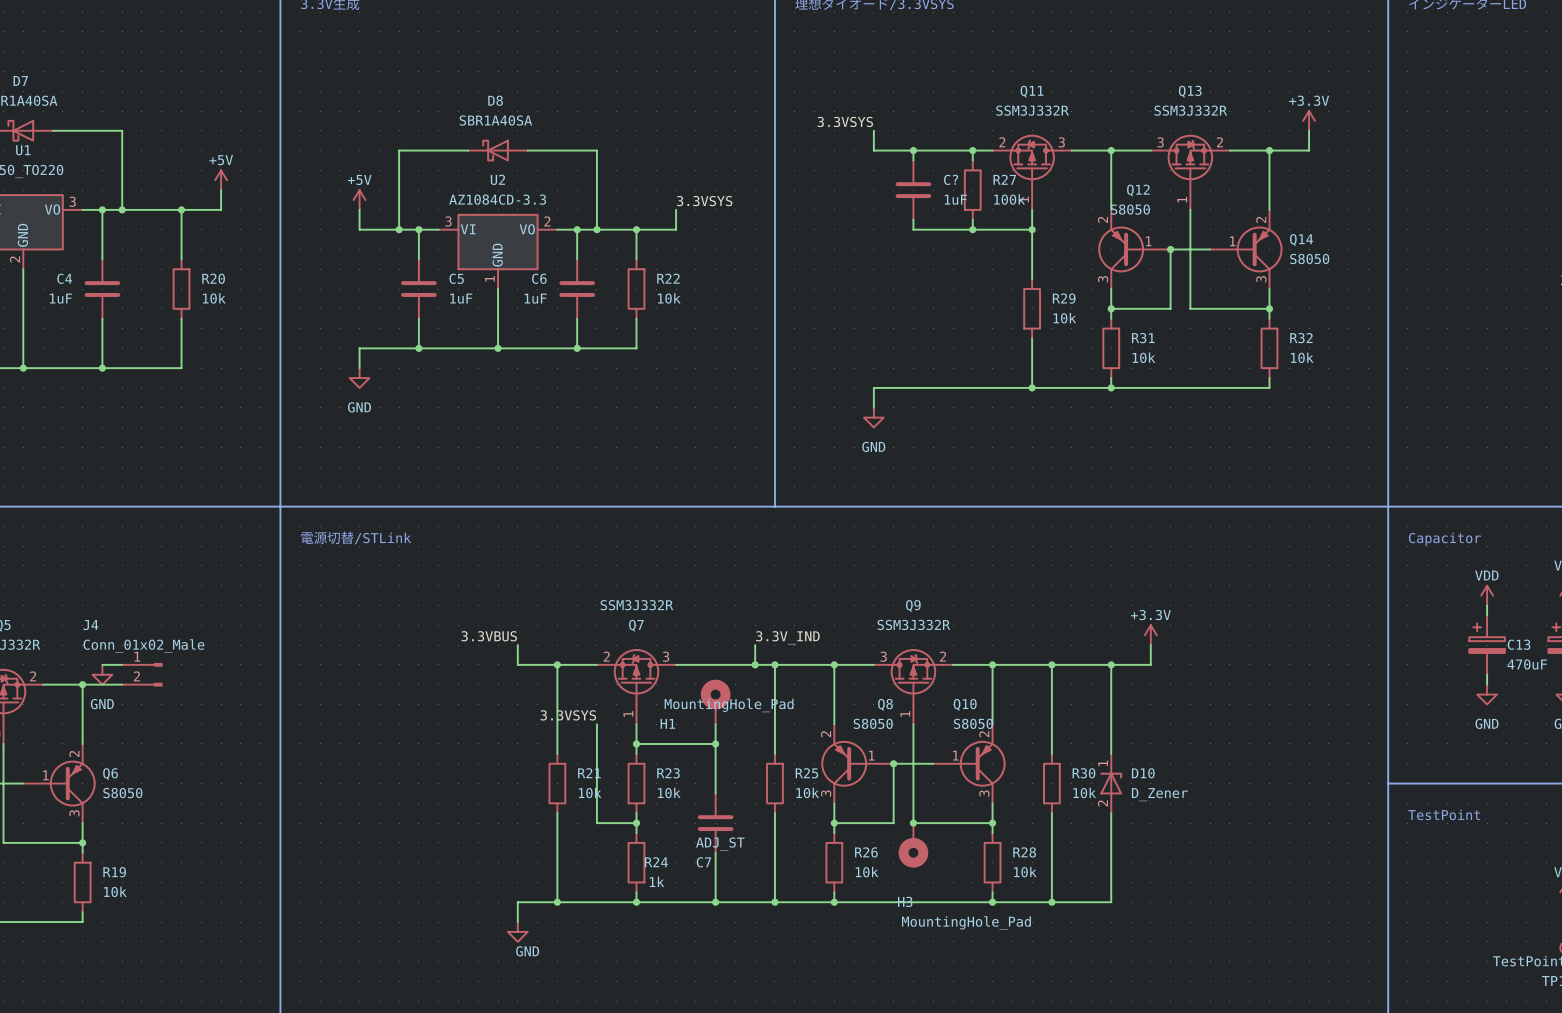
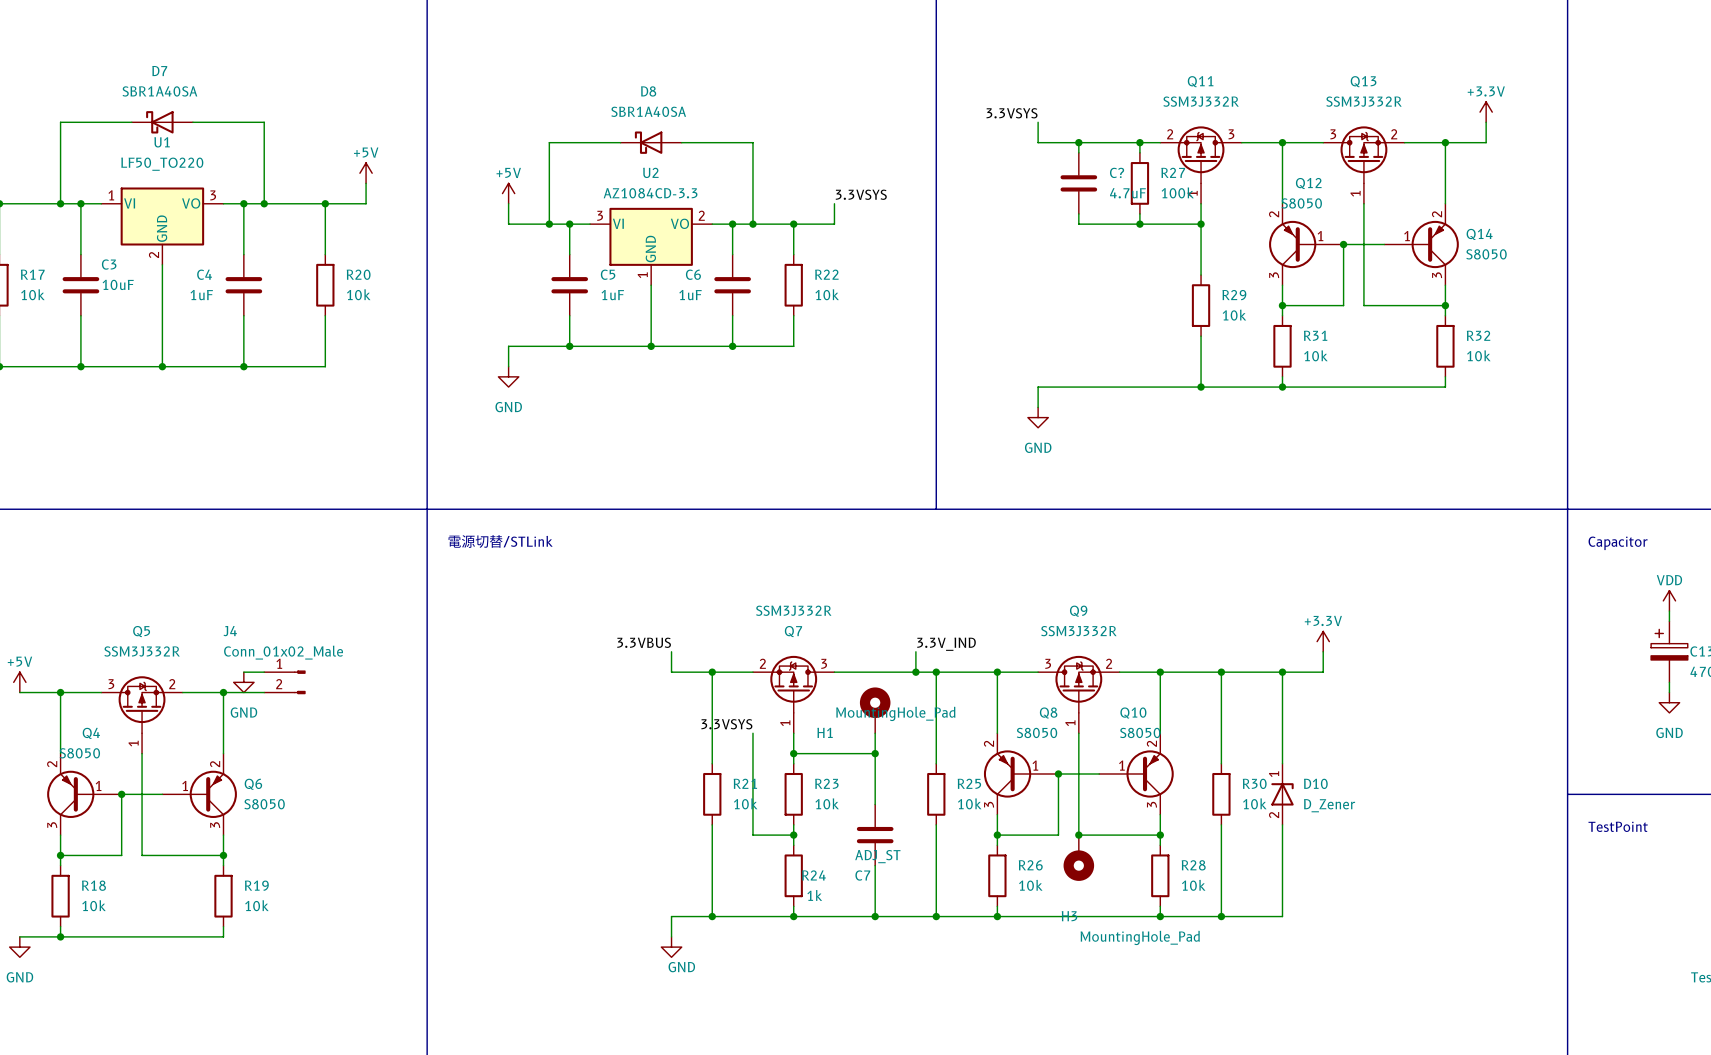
C? value: 1uF (955, 199) -> 4.7uF (1127, 193)

